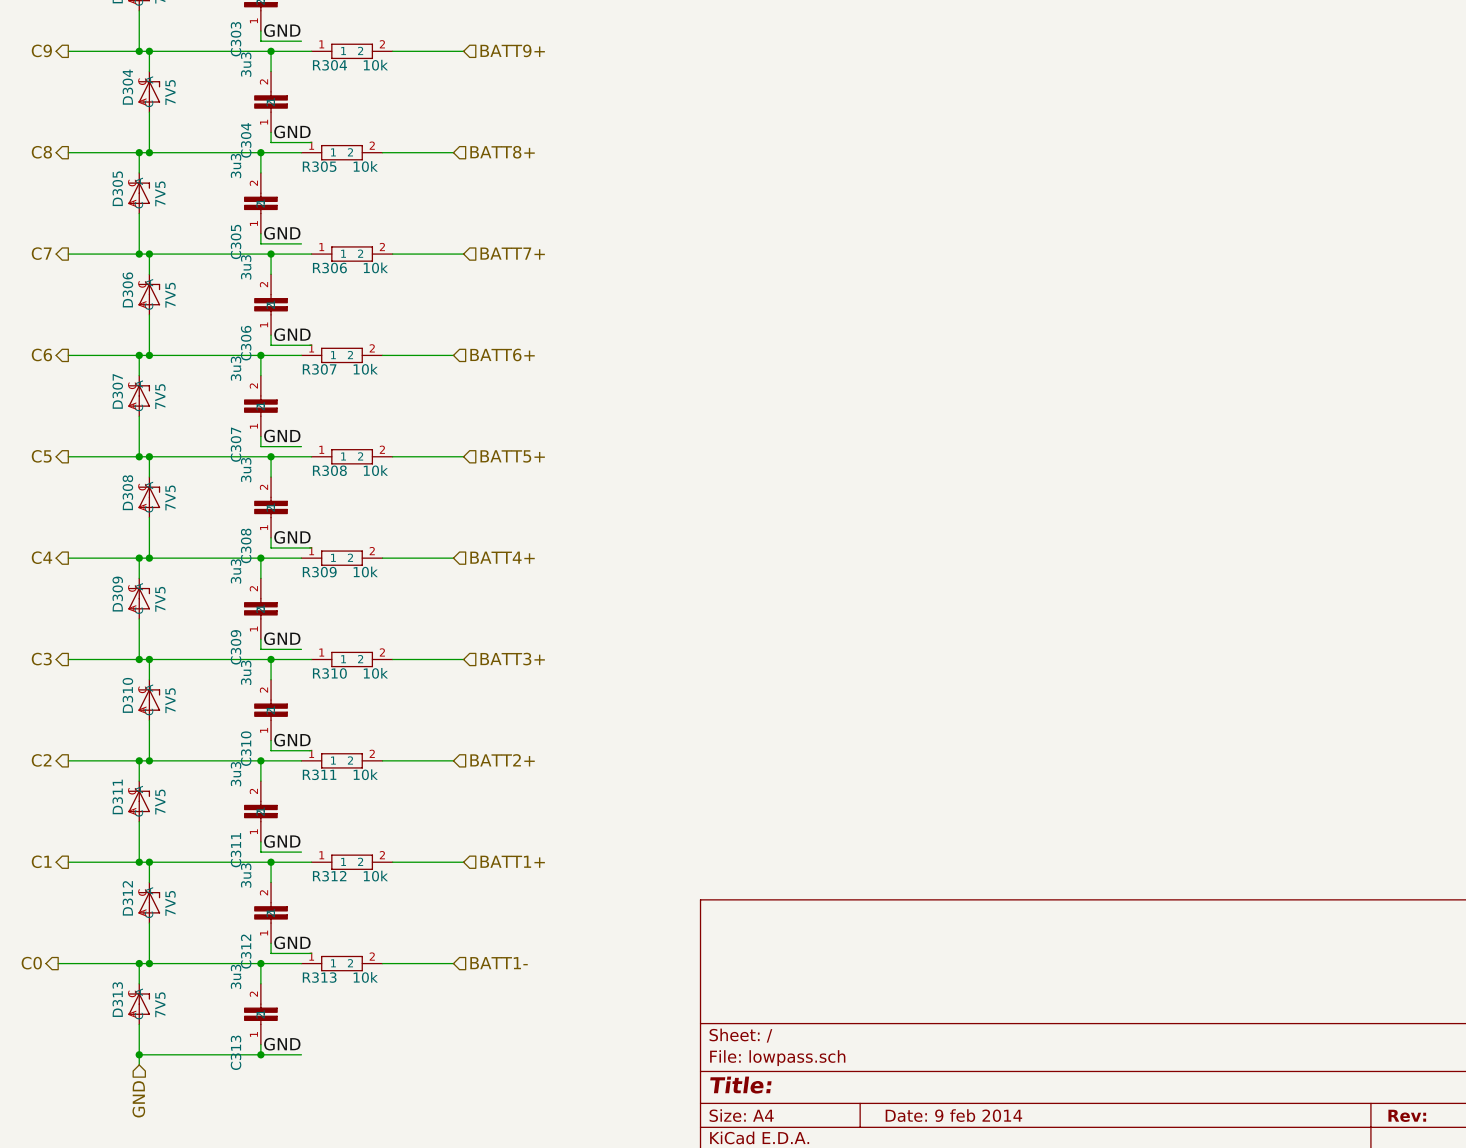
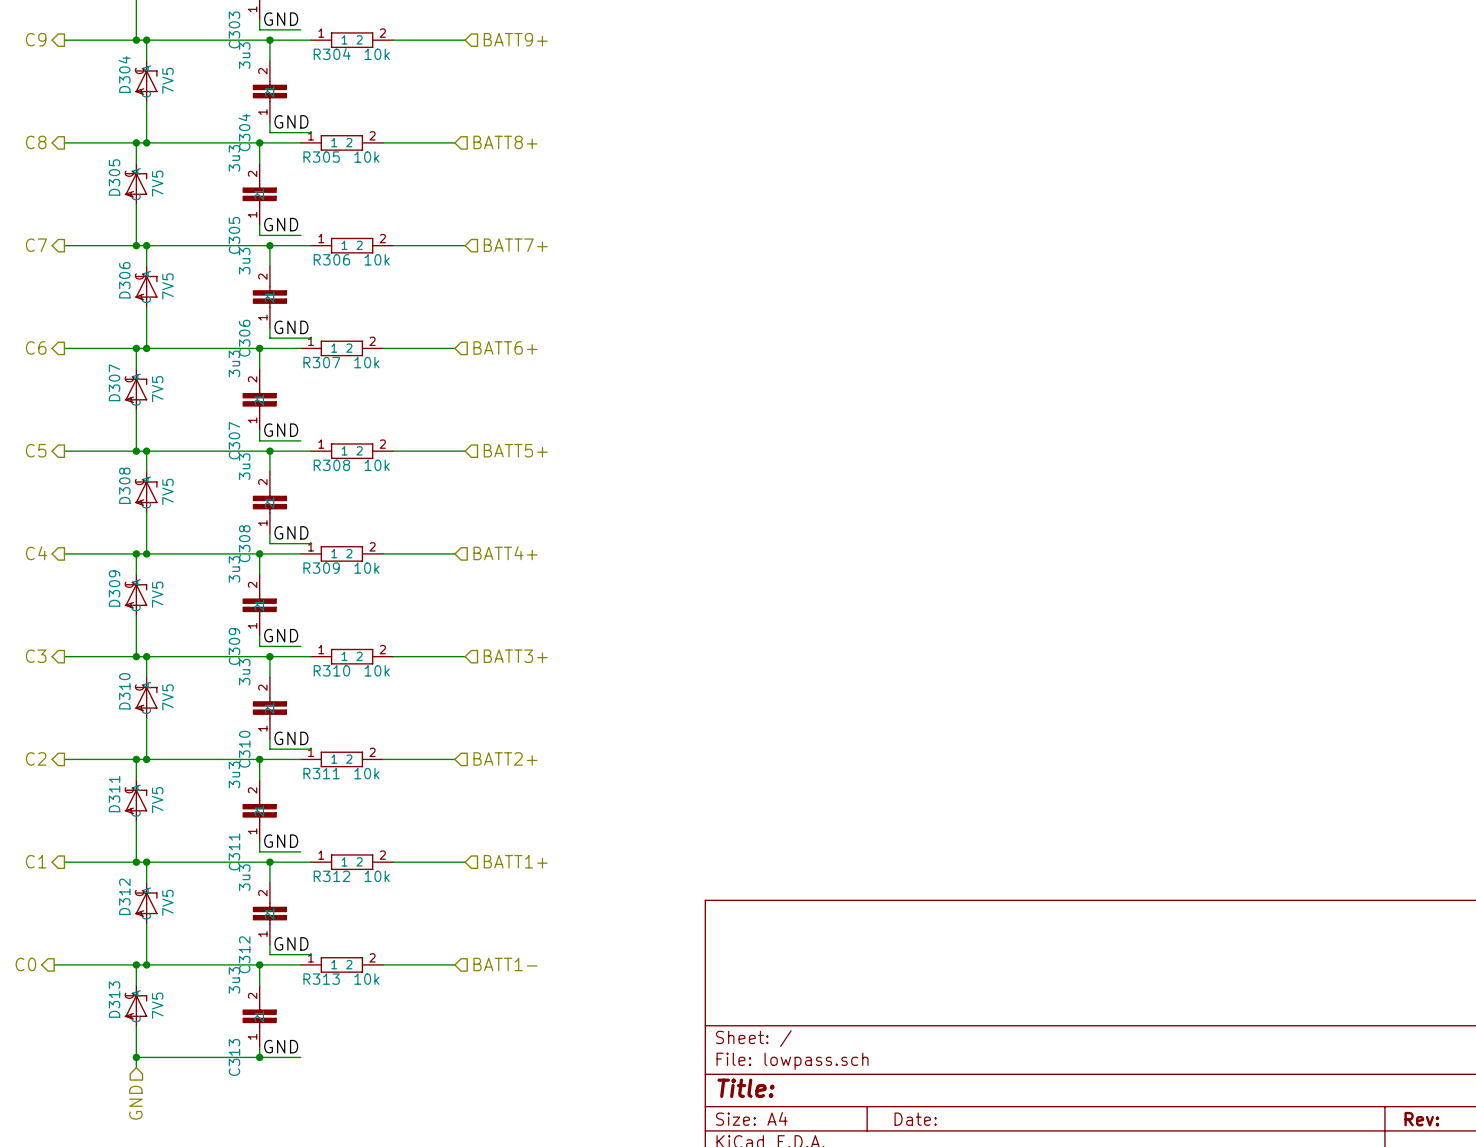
title block: Date: 9 feb 2014 (953, 1115) -> Date: (915, 1119)

